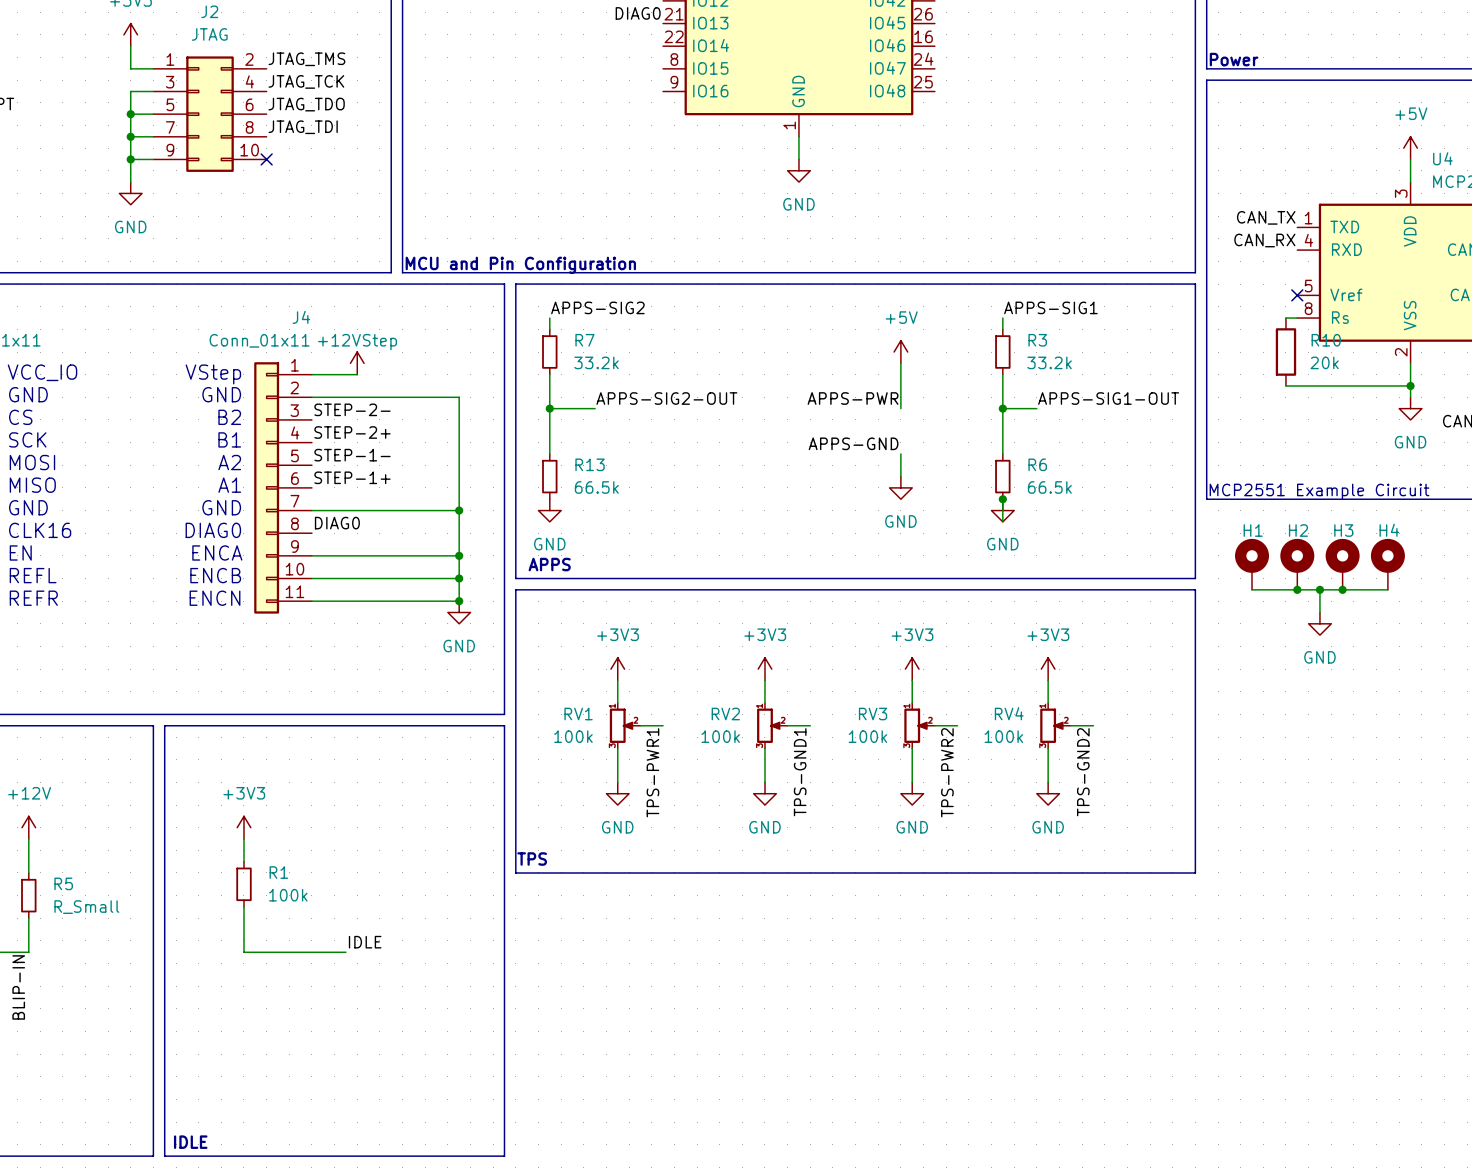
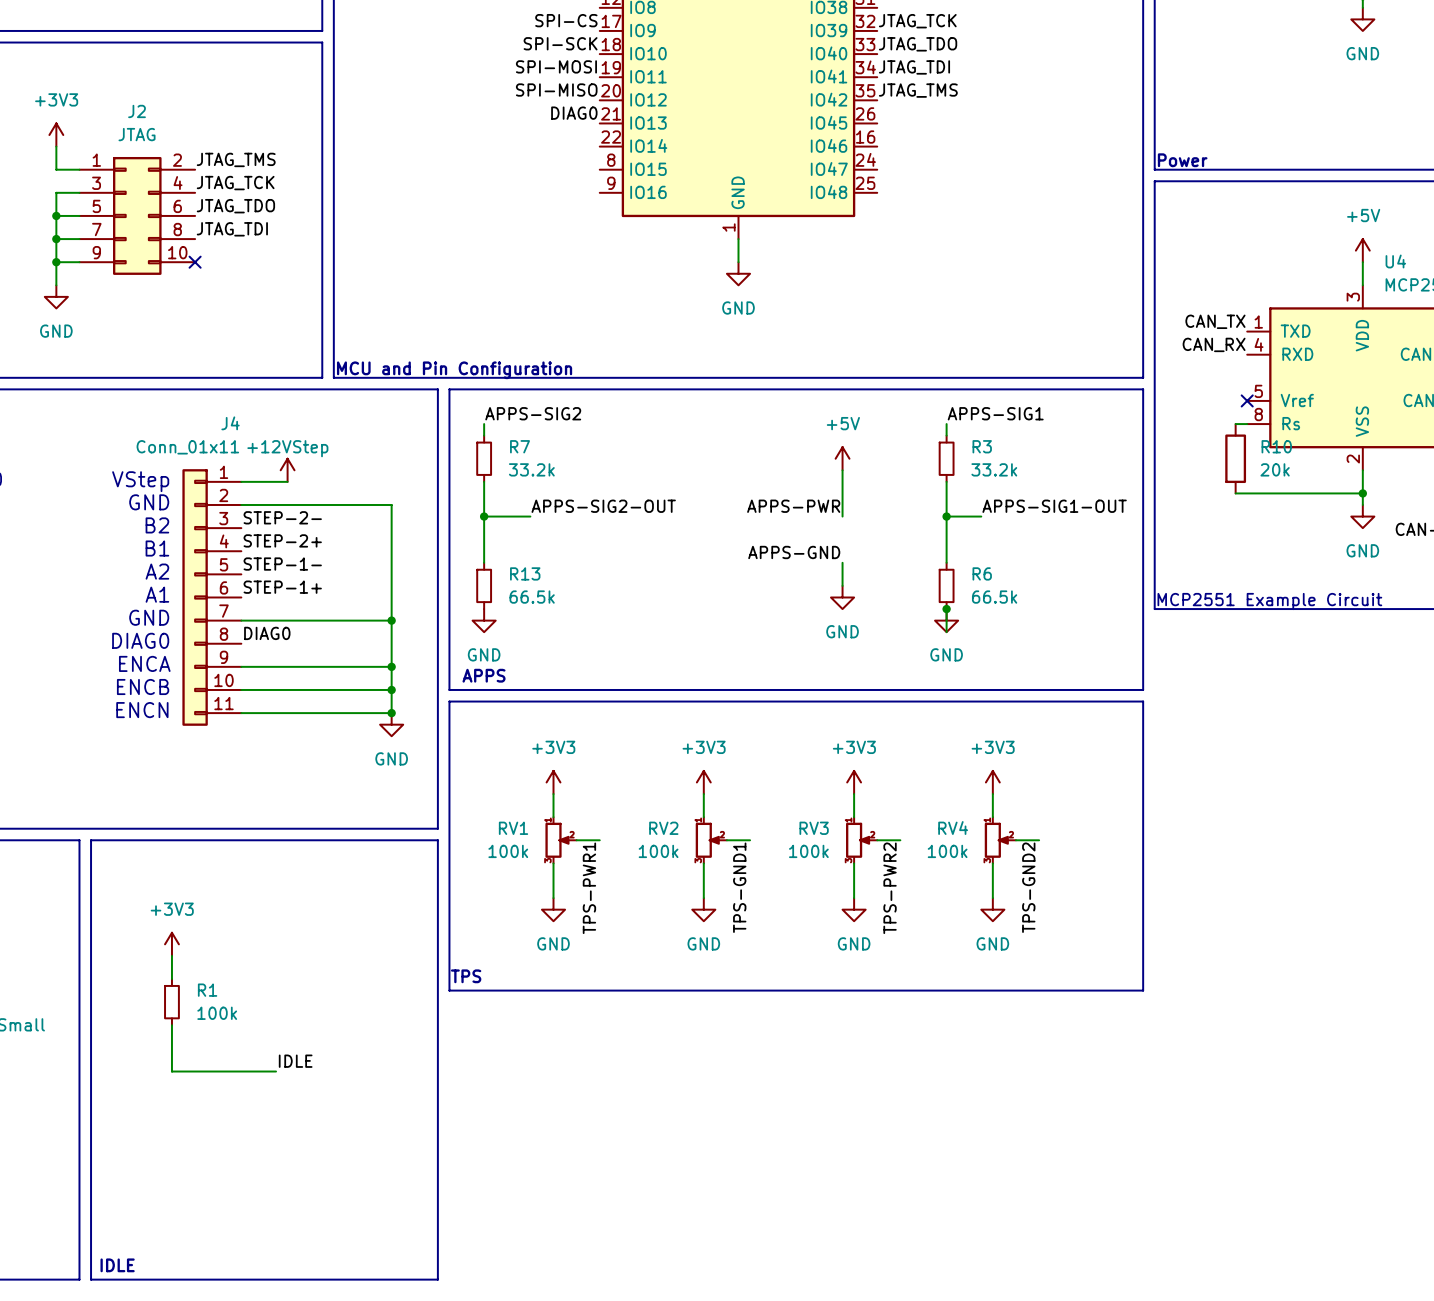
H1: (1252, 564) -> none
H2: (1297, 564) -> none
H3: (1342, 564) -> none
H4: (1387, 564) -> none
wire: (1252, 589) (1387, 589) -> none
junction: (1297, 589) -> none
wire: (1319, 589) (1319, 612) -> none
junction: (1319, 589) -> none
junction: (1342, 589) -> none
power symbol: GND (1319, 623) -> none

